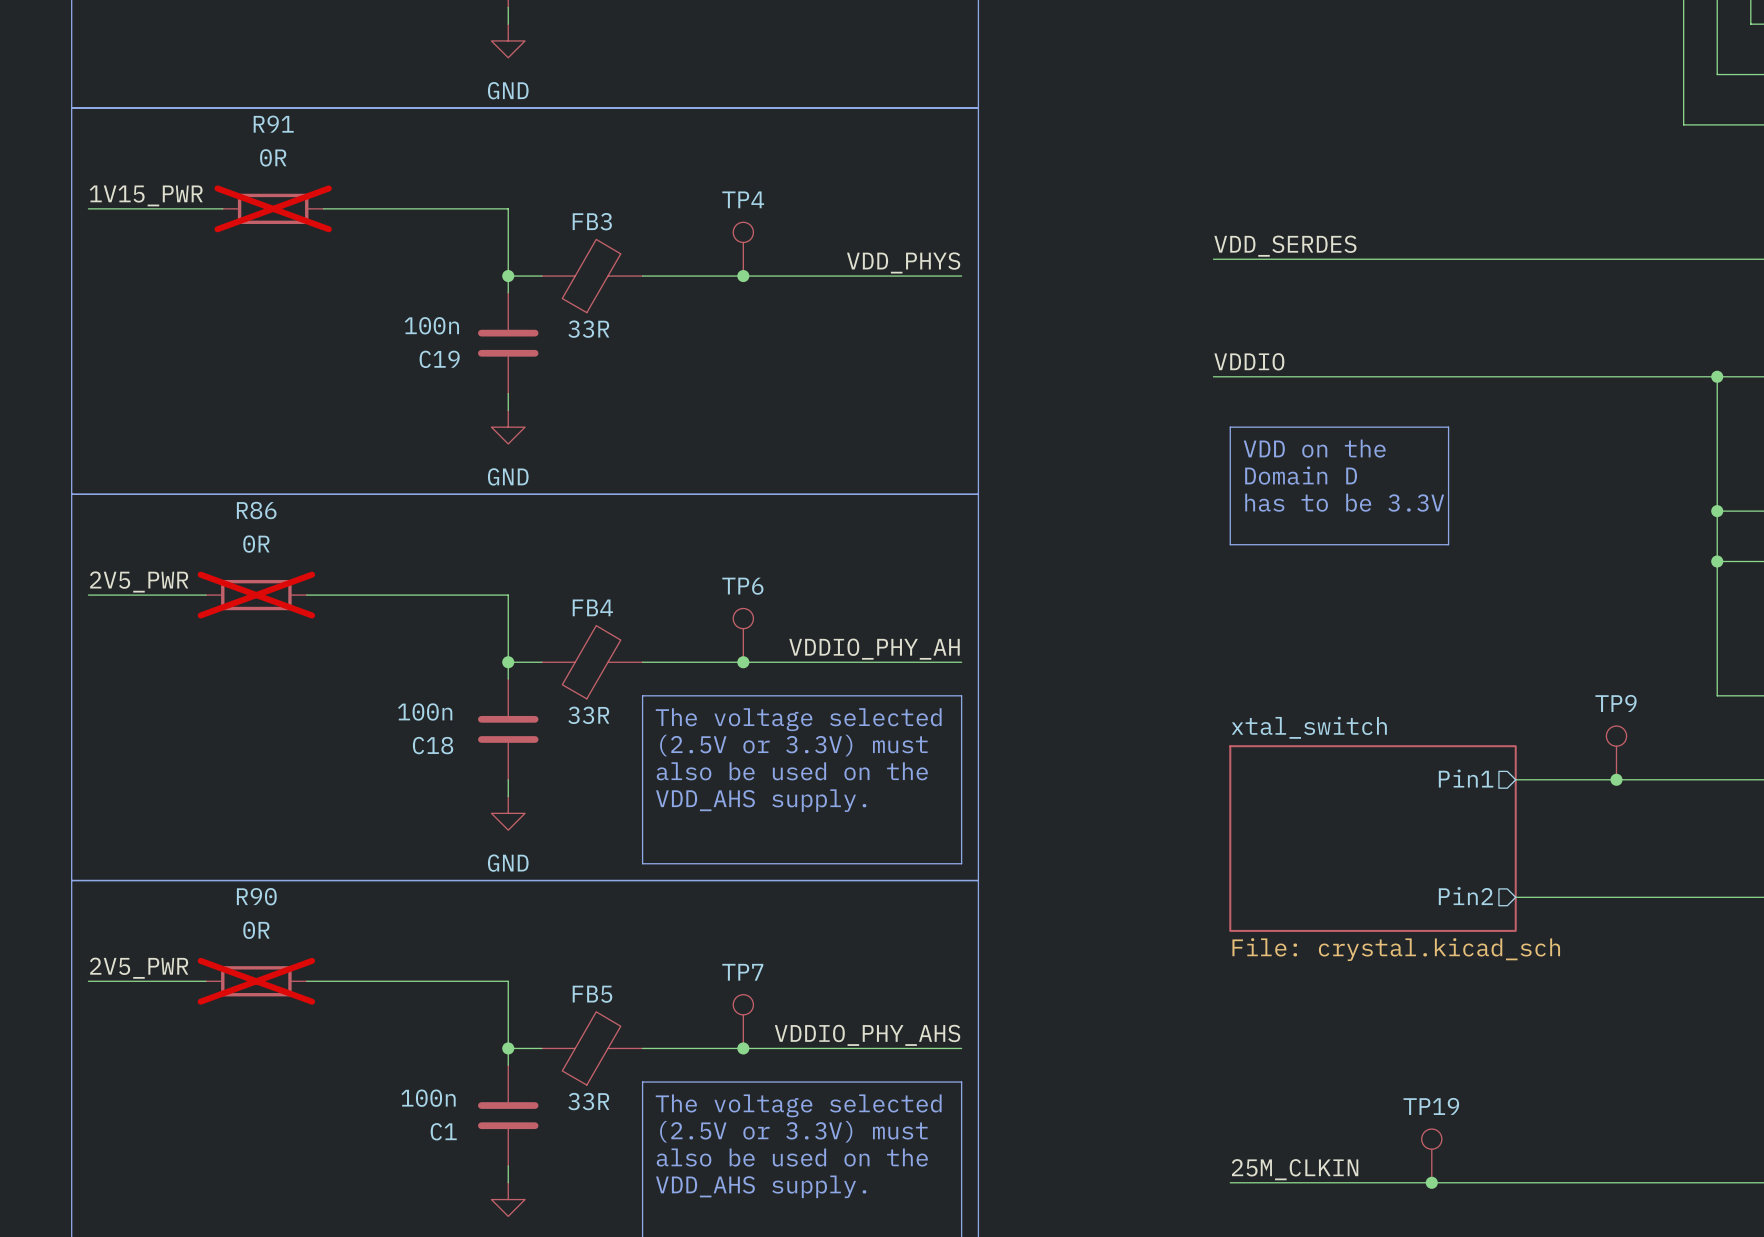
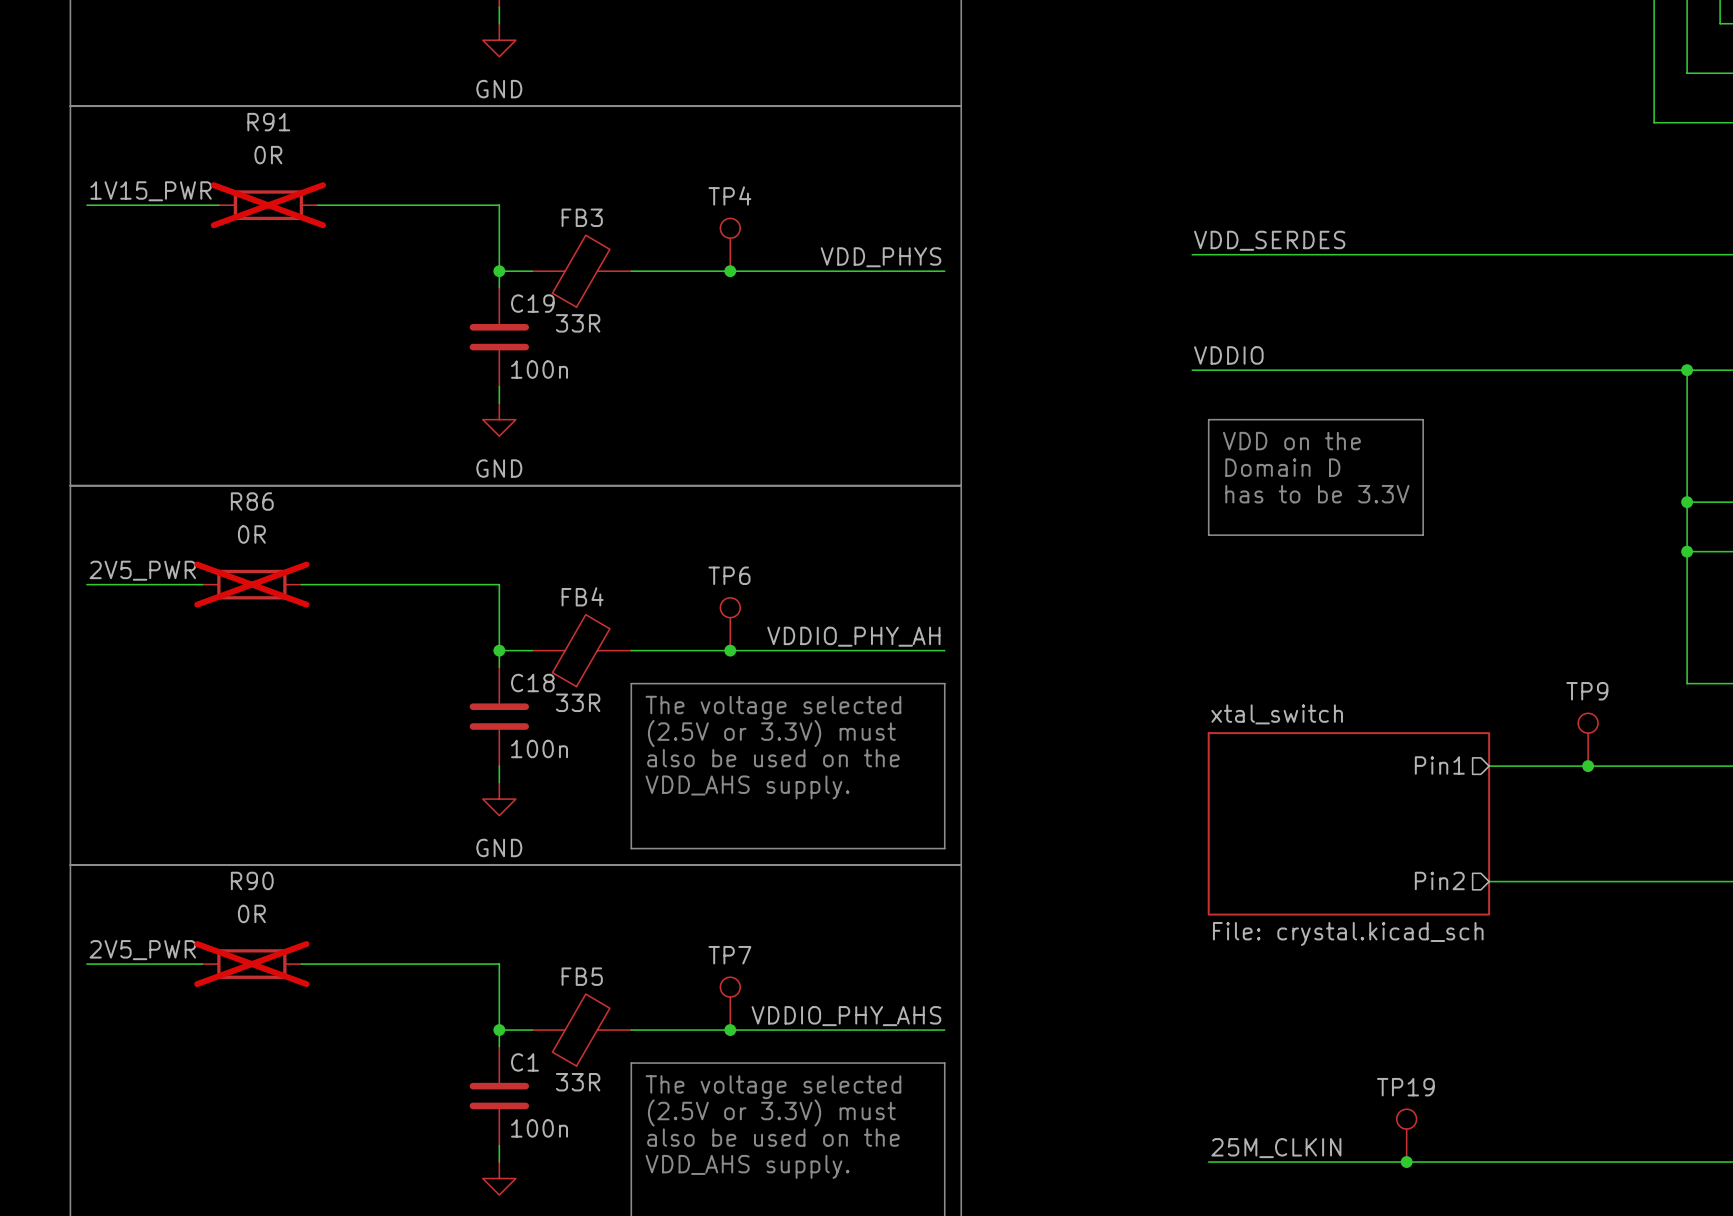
C19 value position: 100n (431, 325) -> 100n (539, 369)
C19 name position: C19 (439, 359) -> C19 (532, 303)
C18 value position: 100n (425, 711) -> 100n (539, 748)
C18 name position: C18 (433, 745) -> C18 (532, 683)
C1 value position: 100n (428, 1098) -> 100n (539, 1128)
C1 name position: C1 (443, 1131) -> C1 (524, 1062)

